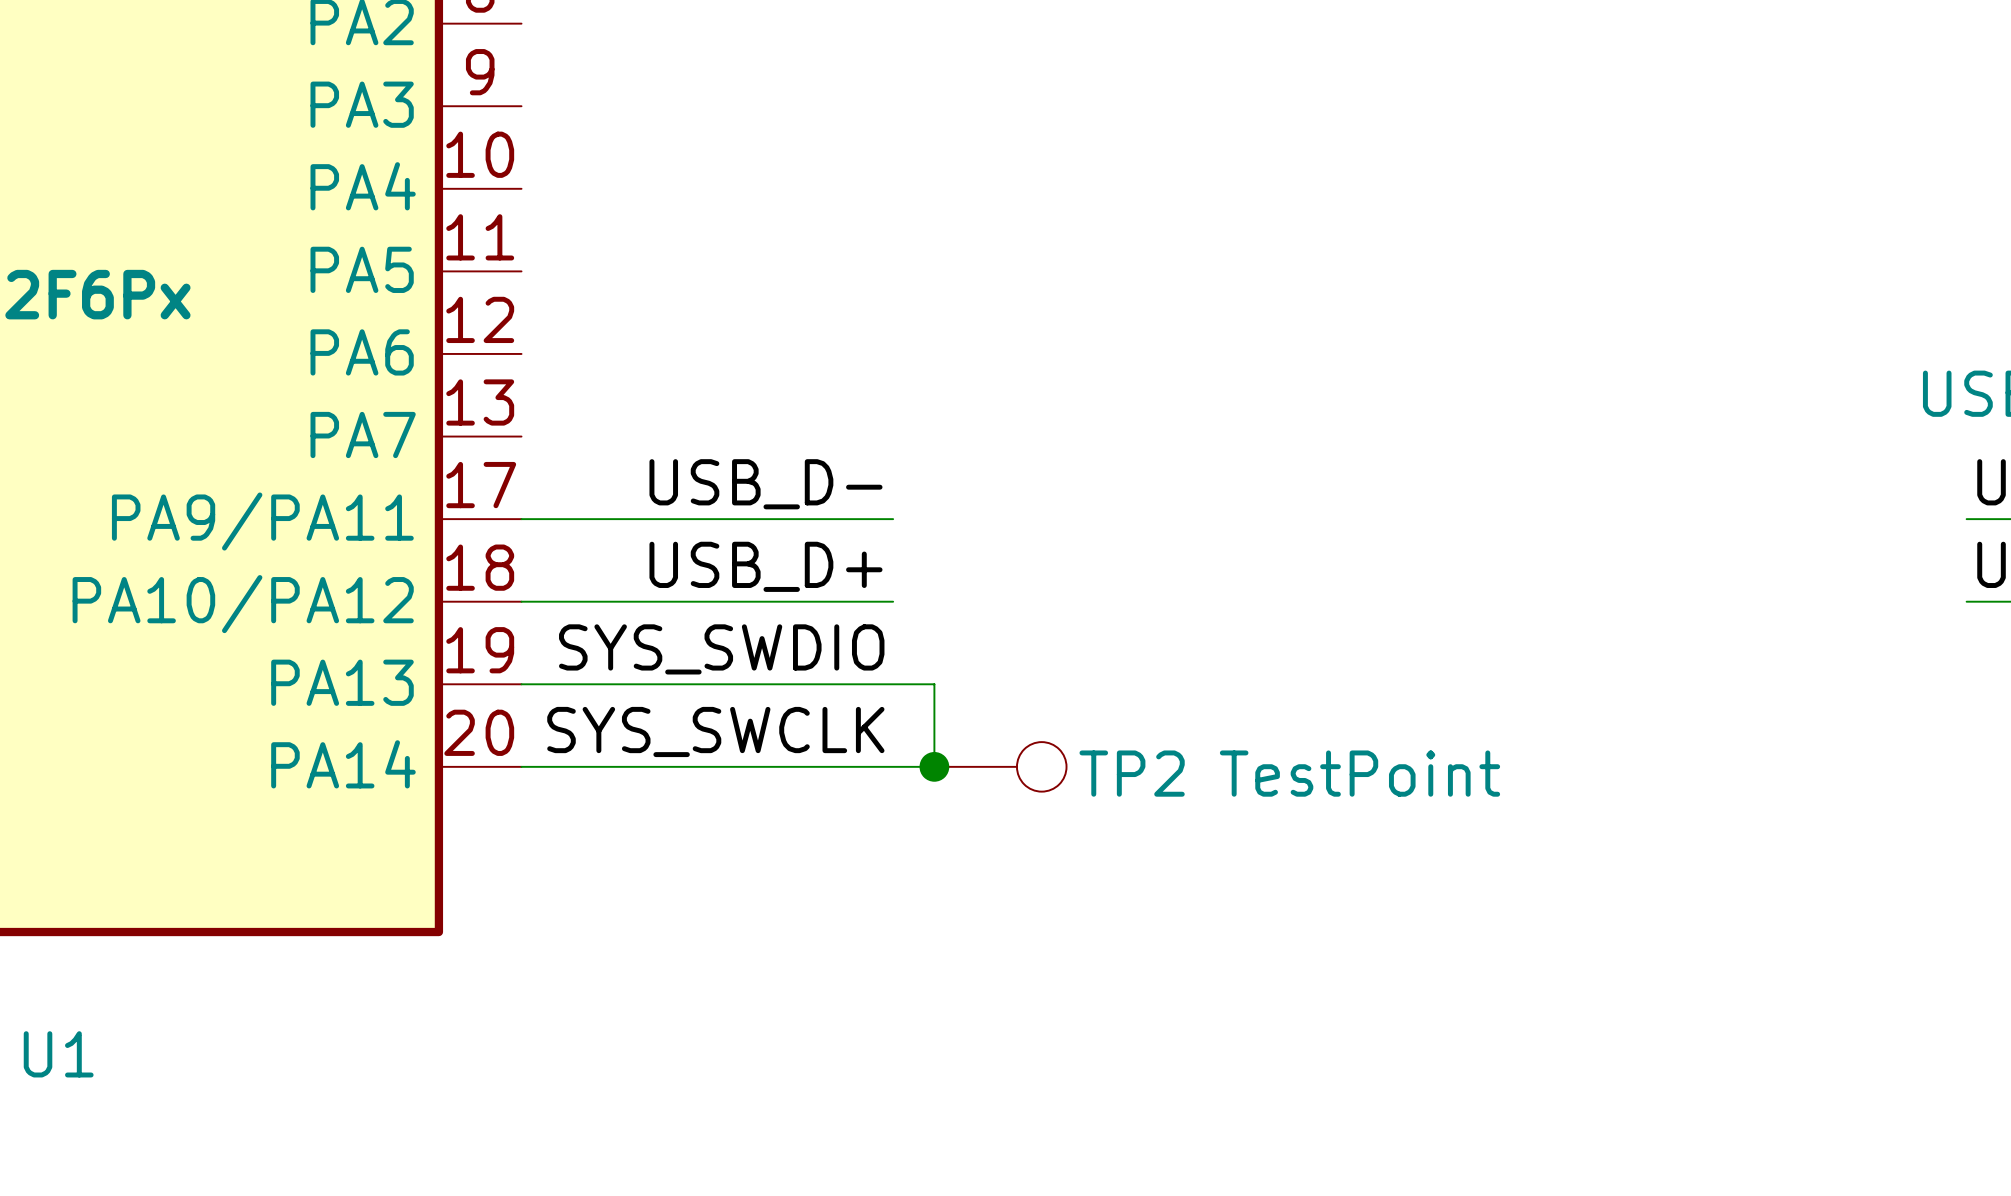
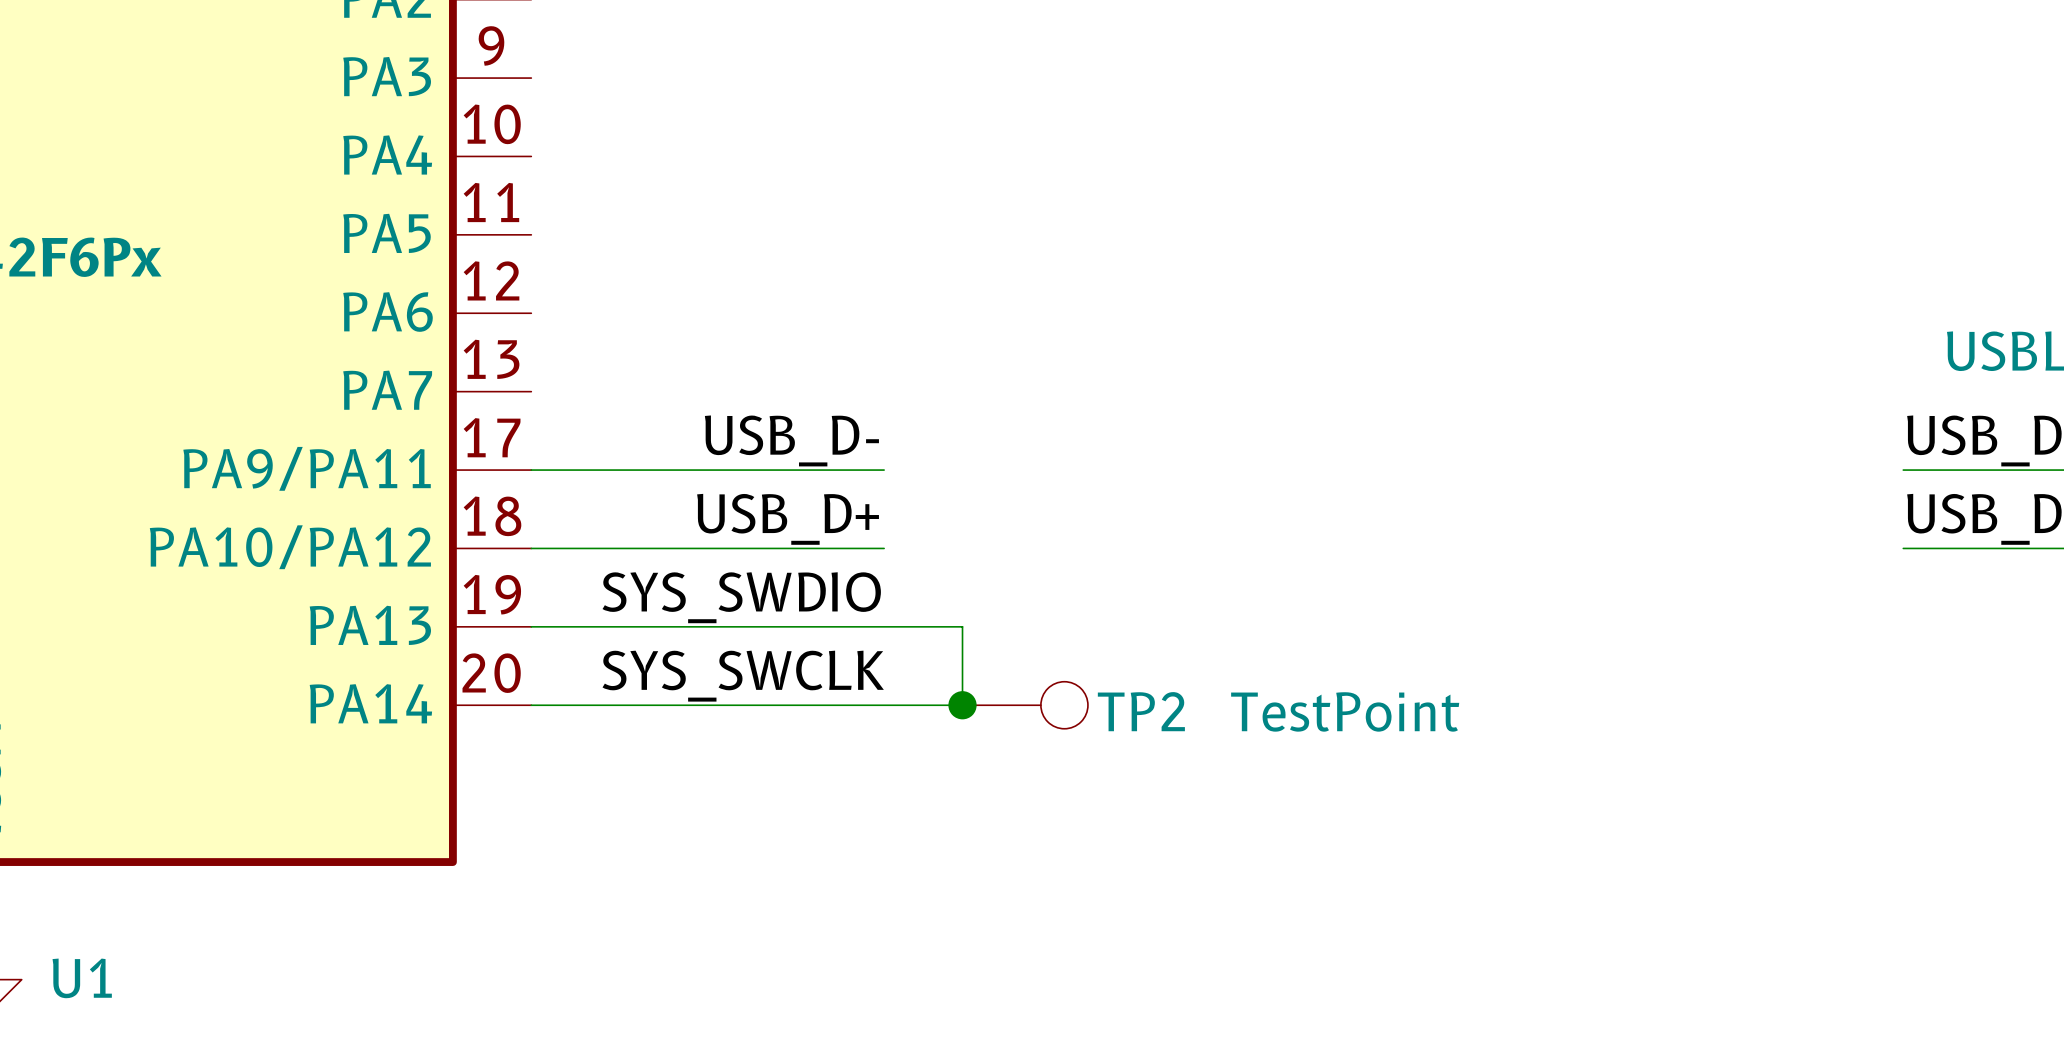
wire: (934, 684) (934, 766) -> (923, 626) (962, 626) (962, 705) (923, 705)
junction position: (934, 766) -> (962, 705)
TP2 position: (1000, 766) -> (1025, 705)

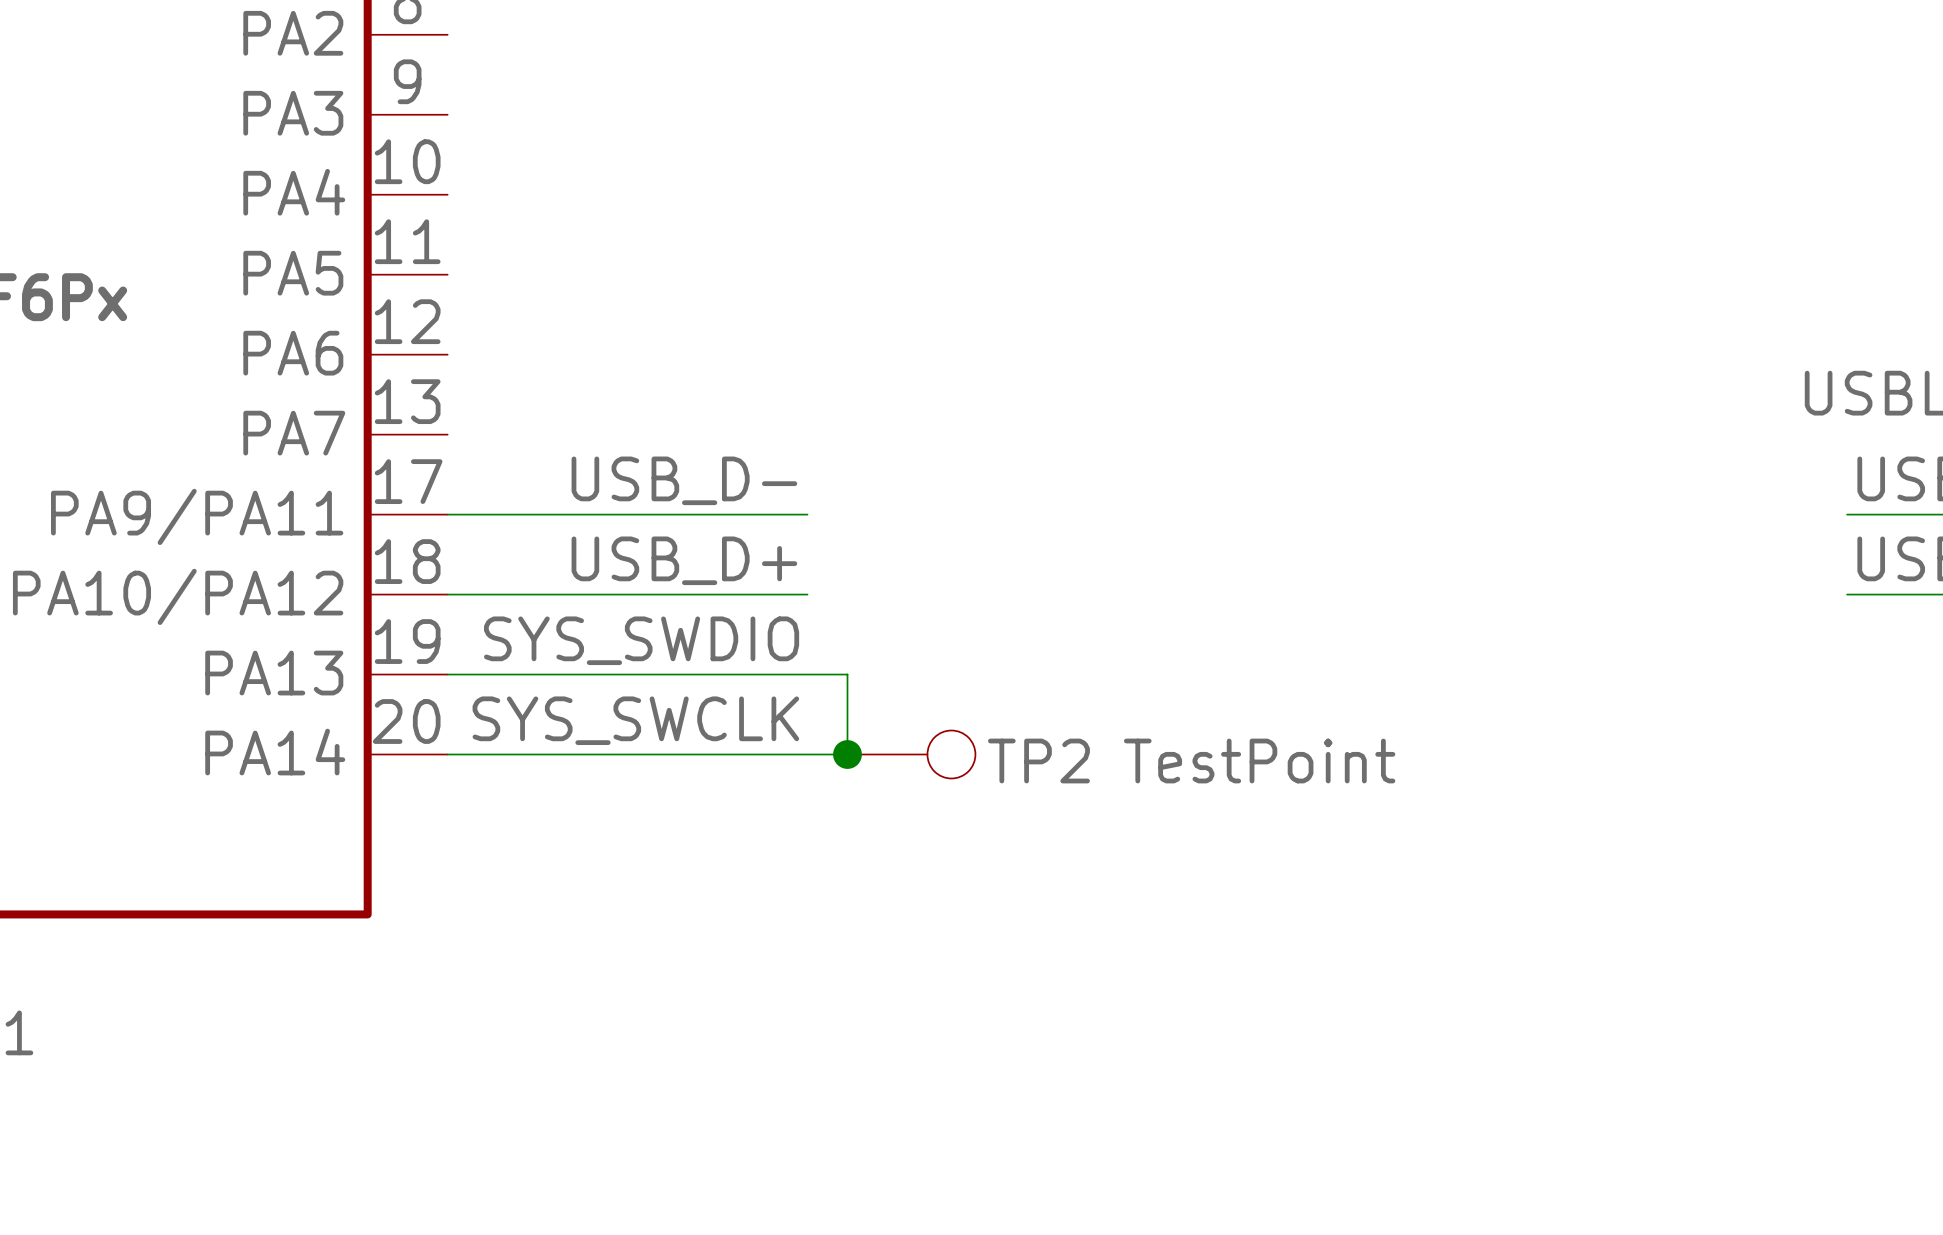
wire: (923, 626) (962, 626) (962, 705) (923, 705) -> (847, 674) (847, 754)
junction position: (962, 705) -> (847, 754)
TP2 position: (1025, 705) -> (911, 754)

